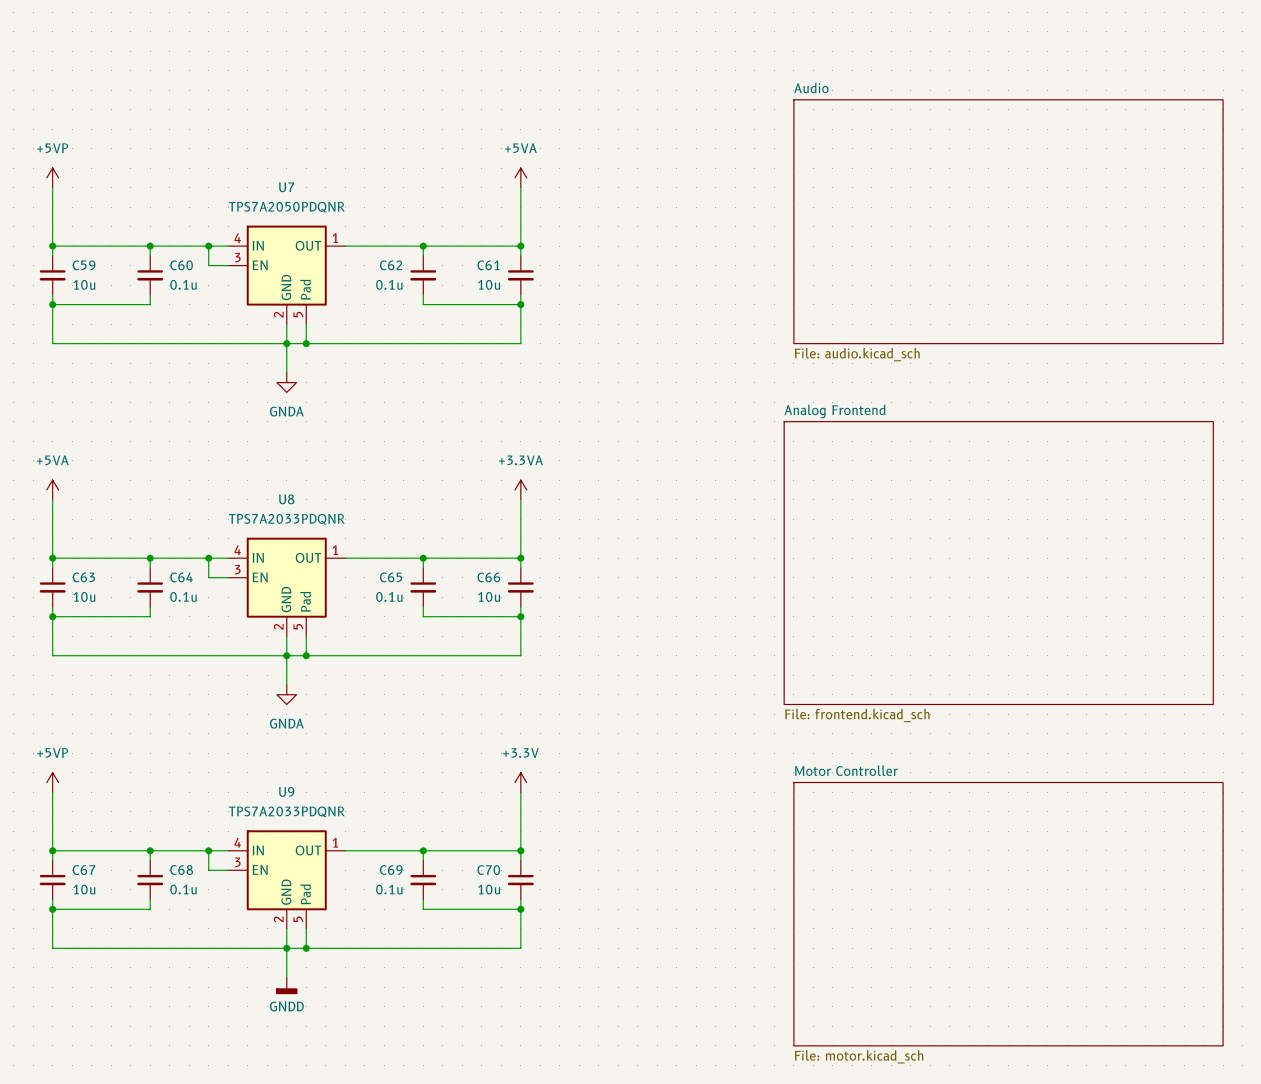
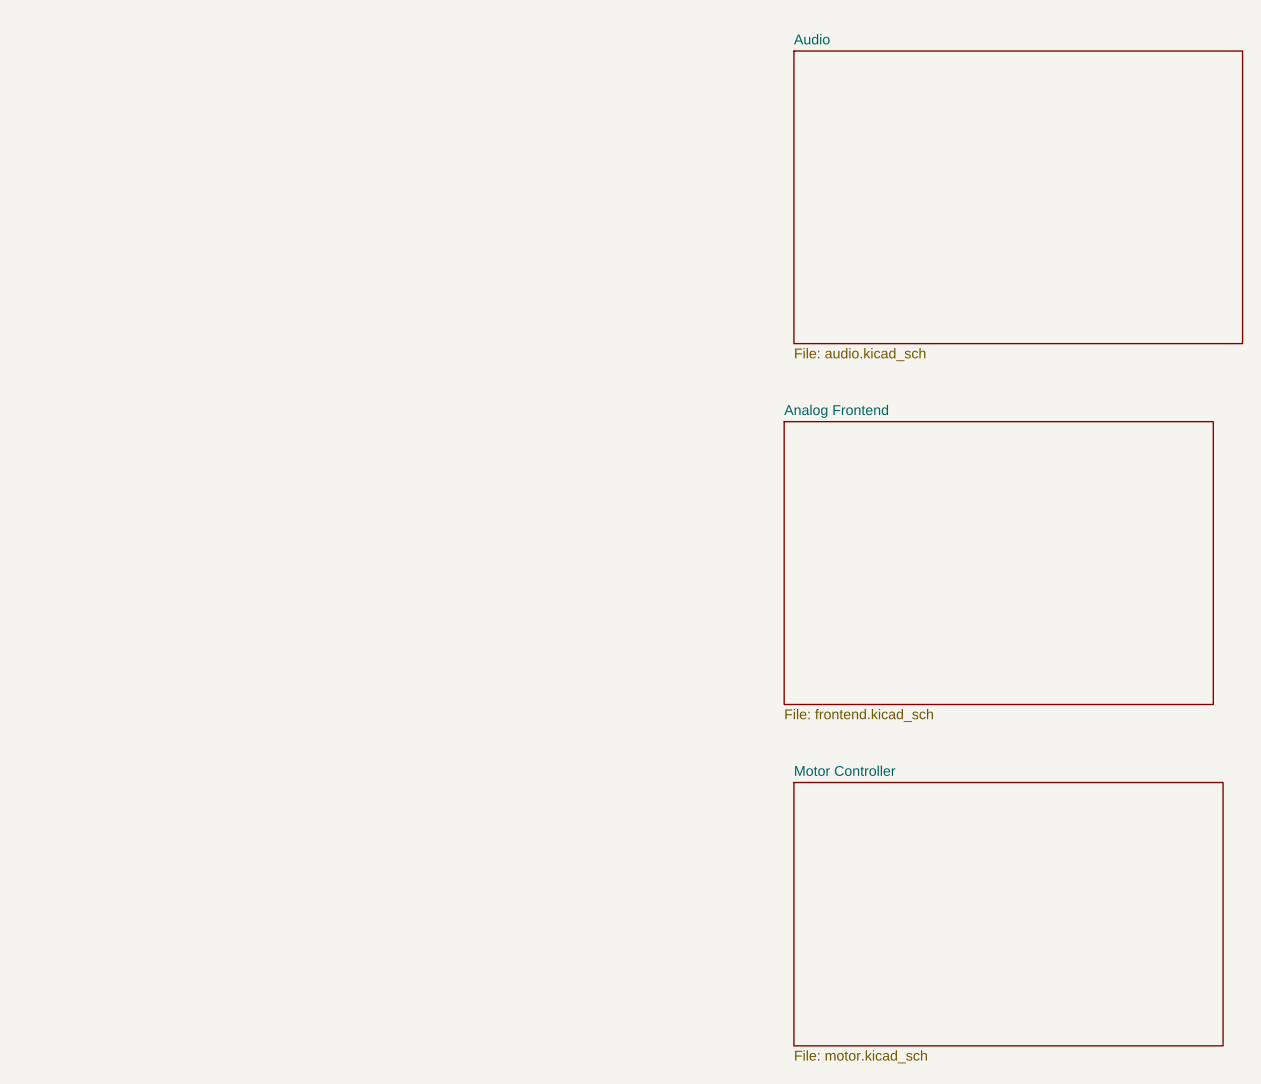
power symbol: +5VP (52, 177) -> none
power symbol: +5VA (520, 177) -> none
wire: (52, 187) (52, 255) -> none
wire: (520, 187) (520, 255) -> none
sheet Audio: none -> File: audio.kicad_sch (1018, 197)
sheet Audio: File: audio.kicad_sch (1008, 221) -> none
wire: (52, 246) (228, 246) -> none
junction: (52, 246) -> none
wire: (150, 246) (150, 255) -> none
junction: (150, 246) -> none
wire: (208, 246) (208, 265) (228, 265) -> none
junction: (208, 246) -> none
wire: (345, 246) (520, 246) -> none
wire: (423, 246) (423, 255) -> none
junction: (423, 246) -> none
junction: (520, 246) -> none
U7: TPS7A2050PDQNR (286, 274) -> none
C59: 10u (52, 275) -> none
C60: 0.1u (150, 275) -> none
C62: 0.1u (423, 275) -> none
C61: 10u (520, 275) -> none
wire: (52, 294) (52, 343) (520, 343) (520, 294) -> none
wire: (150, 294) (150, 304) (52, 304) -> none
wire: (423, 294) (423, 304) (520, 304) -> none
junction: (52, 304) -> none
junction: (520, 304) -> none
wire: (286, 324) (286, 372) -> none
wire: (306, 324) (306, 343) -> none
junction: (286, 343) -> none
junction: (306, 343) -> none
power symbol: GNDA (286, 382) -> none
power symbol: +5VA (52, 489) -> none
power symbol: +3.3VA (520, 489) -> none
wire: (52, 499) (52, 567) -> none
wire: (520, 499) (520, 567) -> none
wire: (52, 558) (228, 558) -> none
junction: (52, 558) -> none
wire: (150, 558) (150, 567) -> none
junction: (150, 558) -> none
wire: (208, 558) (208, 577) (228, 577) -> none
junction: (208, 558) -> none
wire: (345, 558) (520, 558) -> none
wire: (423, 558) (423, 567) -> none
junction: (423, 558) -> none
junction: (520, 558) -> none
U8: TPS7A2033PDQNR (286, 586) -> none
C63: 10u (52, 587) -> none
C64: 0.1u (150, 587) -> none
C65: 0.1u (423, 587) -> none
C66: 10u (520, 587) -> none
wire: (52, 606) (52, 655) (520, 655) (520, 606) -> none
wire: (150, 606) (150, 616) (52, 616) -> none
wire: (423, 606) (423, 616) (520, 616) -> none
junction: (52, 616) -> none
junction: (520, 616) -> none
wire: (286, 636) (286, 684) -> none
wire: (306, 636) (306, 655) -> none
junction: (286, 655) -> none
junction: (306, 655) -> none
power symbol: GNDA (286, 694) -> none
power symbol: +5VP (52, 782) -> none
power symbol: +3.3V (520, 782) -> none
wire: (52, 792) (52, 860) -> none
wire: (520, 792) (520, 860) -> none
wire: (52, 850) (228, 850) -> none
junction: (52, 850) -> none
wire: (150, 850) (150, 860) -> none
junction: (150, 850) -> none
wire: (208, 850) (208, 870) (228, 870) -> none
junction: (208, 850) -> none
wire: (345, 850) (520, 850) -> none
wire: (423, 850) (423, 860) -> none
junction: (423, 850) -> none
junction: (520, 850) -> none
U9: TPS7A2033PDQNR (286, 879) -> none
C67: 10u (52, 880) -> none
C68: 0.1u (150, 880) -> none
C69: 0.1u (423, 880) -> none
C70: 10u (520, 880) -> none
wire: (52, 899) (52, 948) (520, 948) (520, 899) -> none
wire: (150, 899) (150, 909) (52, 909) -> none
wire: (423, 899) (423, 909) (520, 909) -> none
junction: (52, 909) -> none
junction: (520, 909) -> none
wire: (286, 928) (286, 977) -> none
wire: (306, 928) (306, 948) -> none
junction: (286, 948) -> none
junction: (306, 948) -> none
power symbol: GNDD (286, 985) -> none

